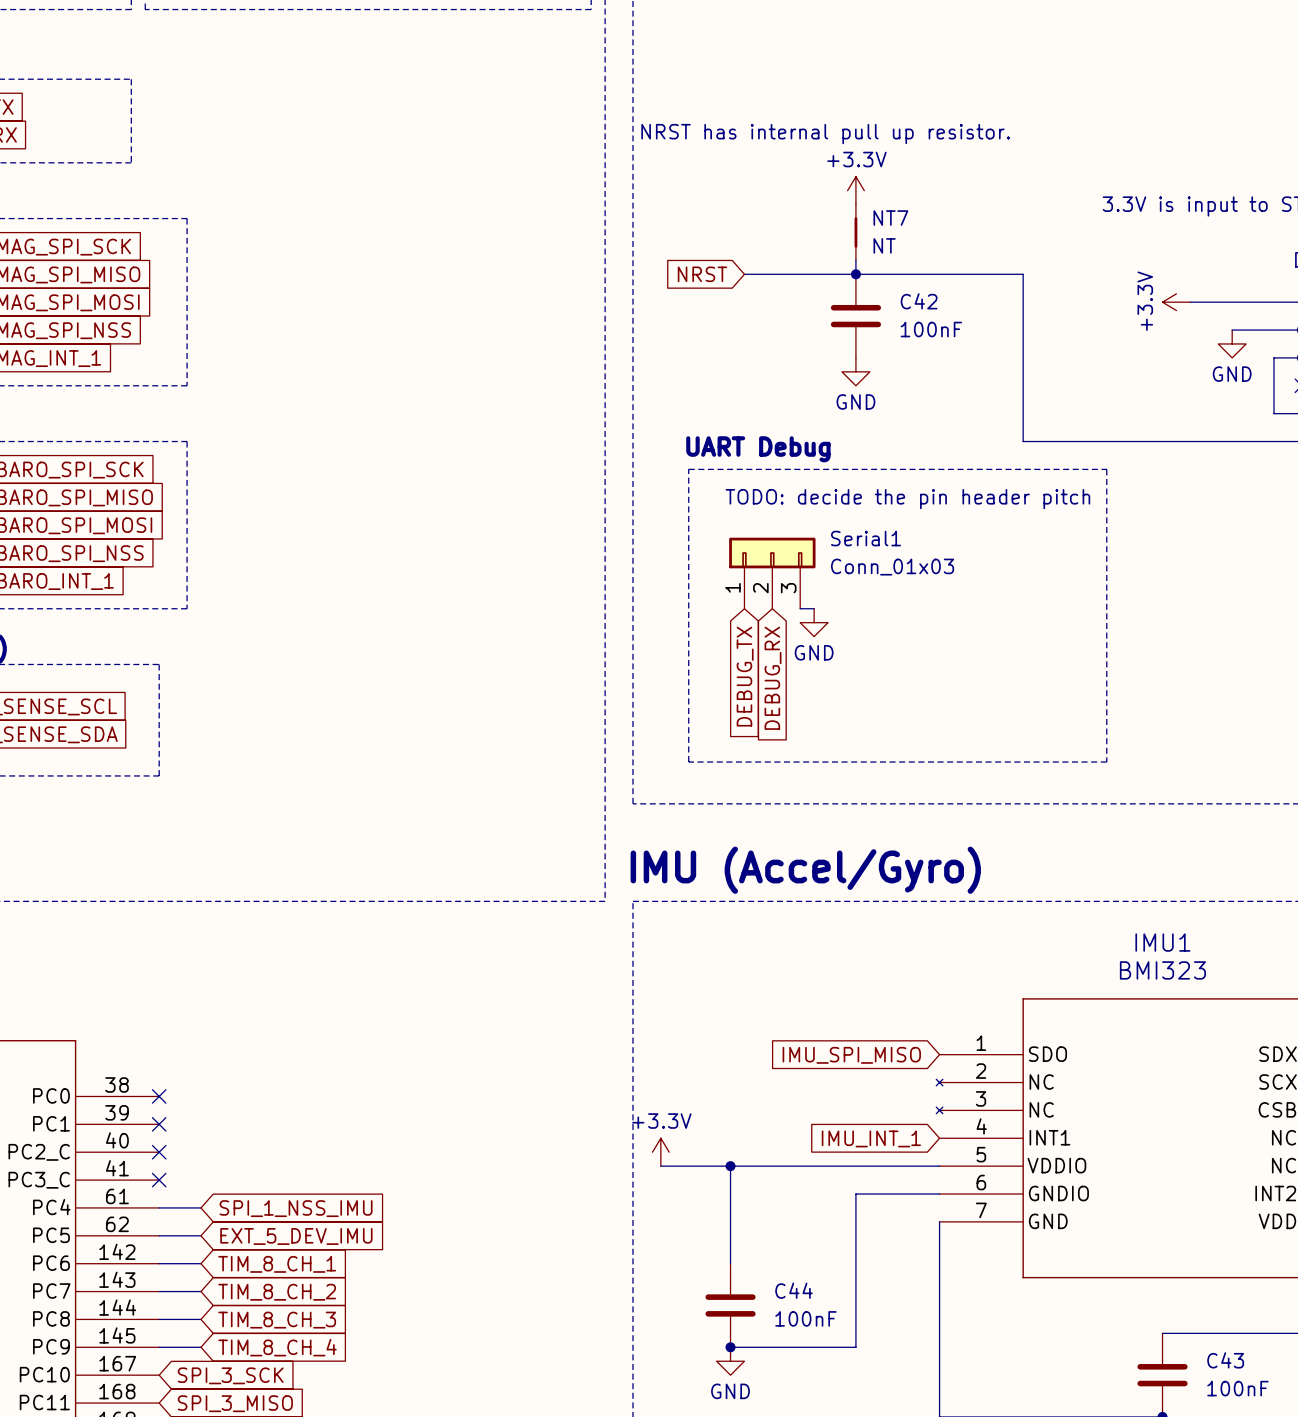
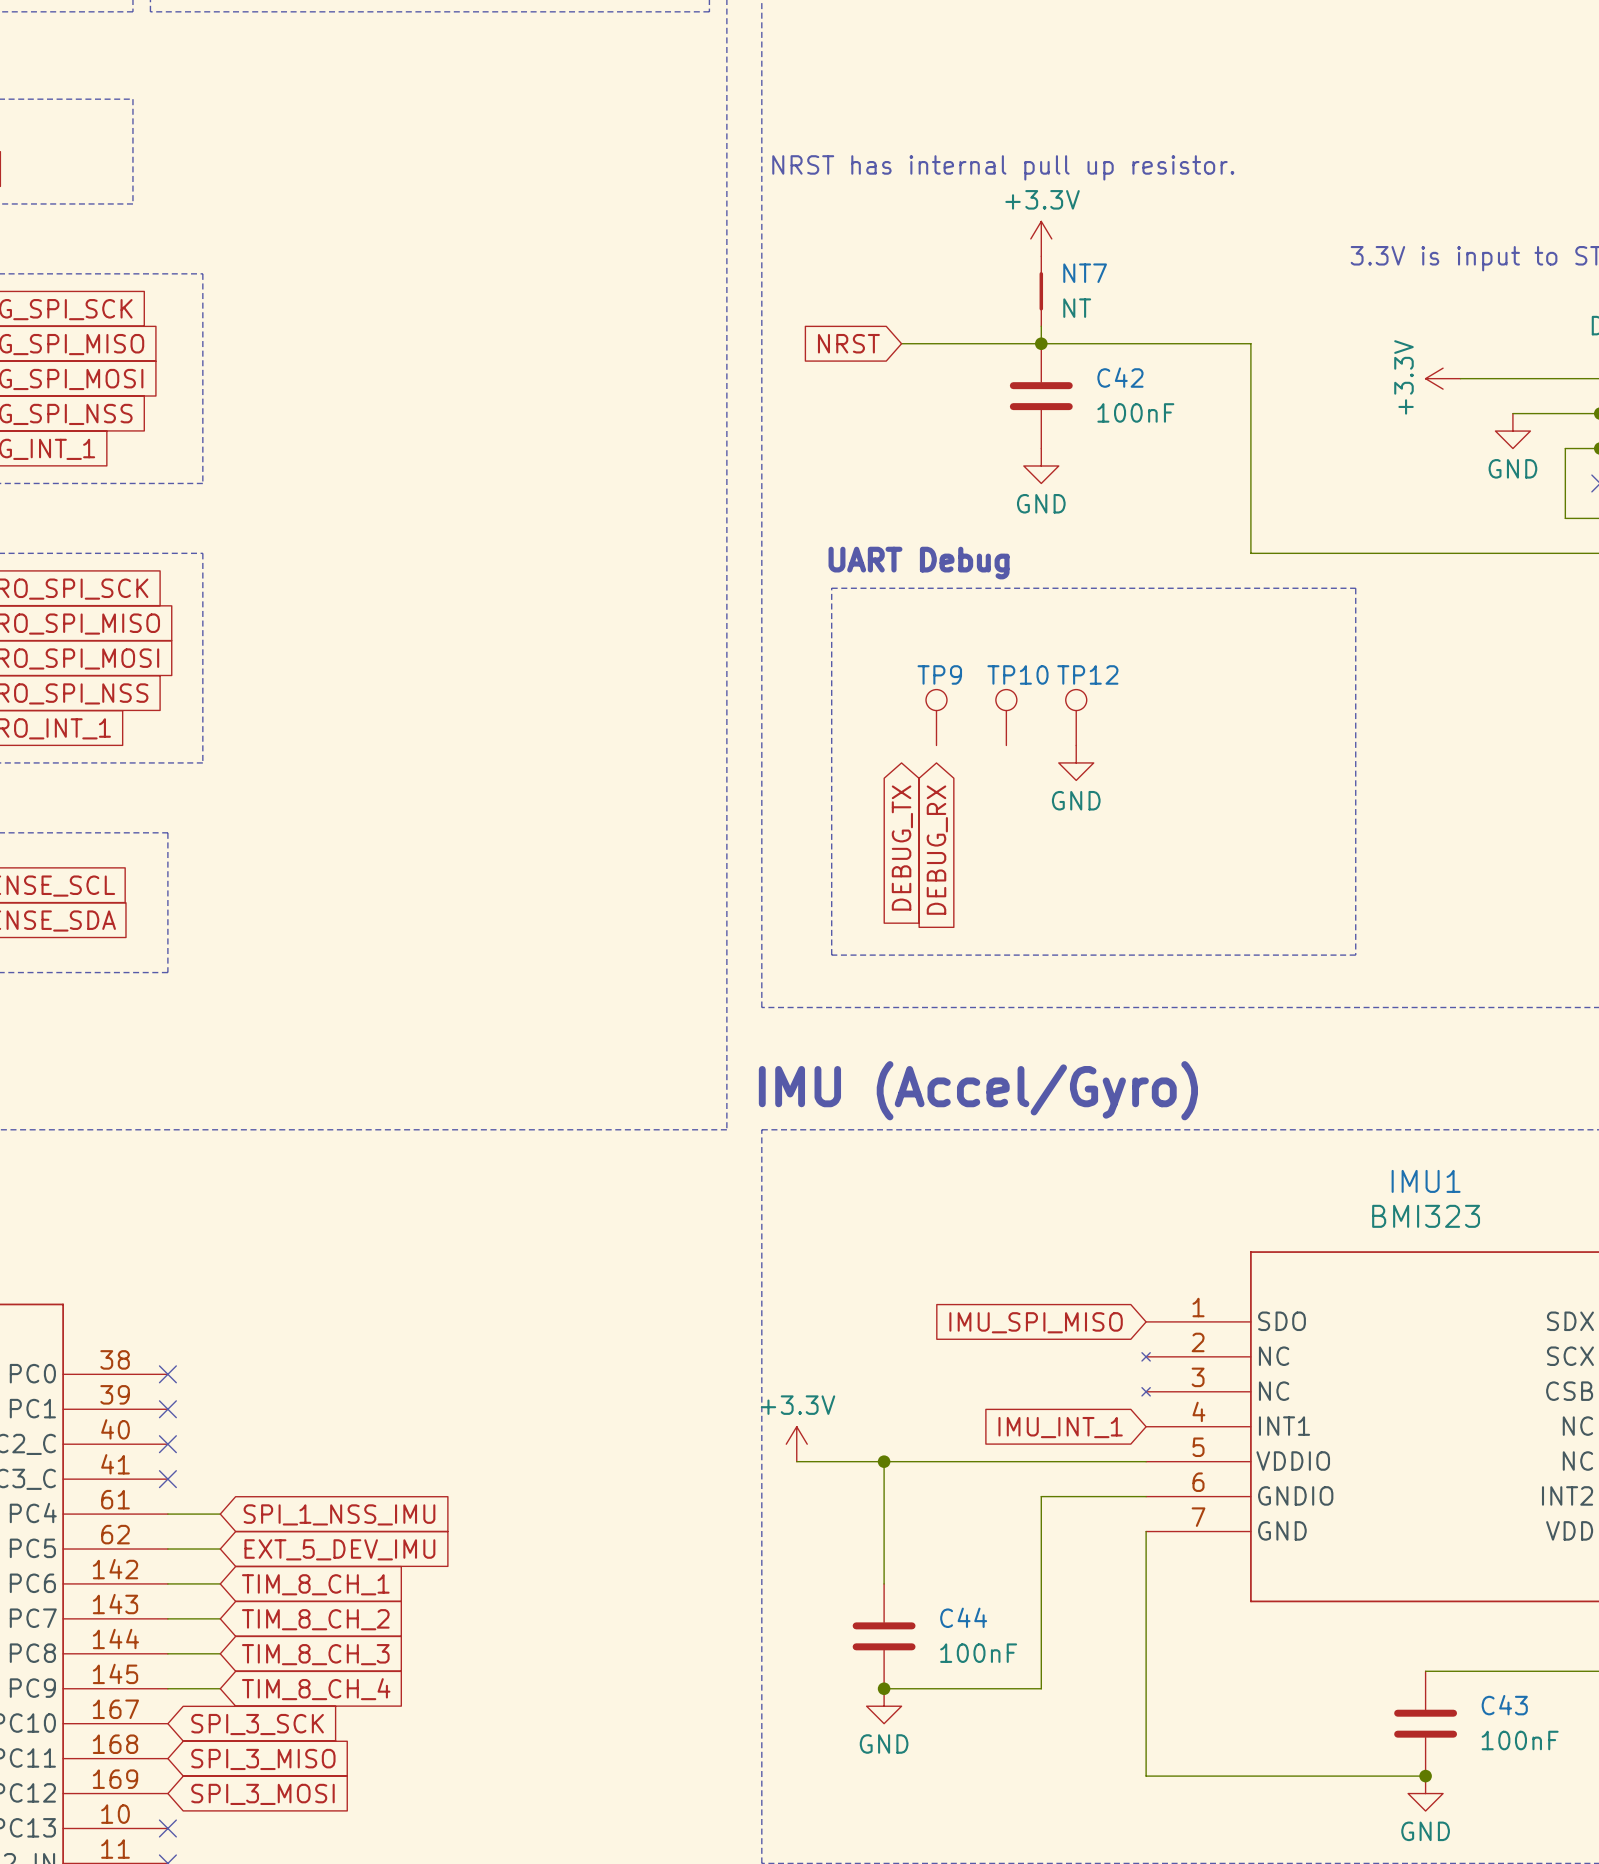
text: TODO: decide the pin header pitch (907, 499) -> none
TP9: none -> (936, 717)
TP10: none -> (1006, 717)
TP12: none -> (1076, 717)
Serial1: Conn_01x03 (772, 573) -> none
wire: (800, 608) (814, 608) -> none
power symbol position: GND (814, 622) -> GND (1076, 762)

